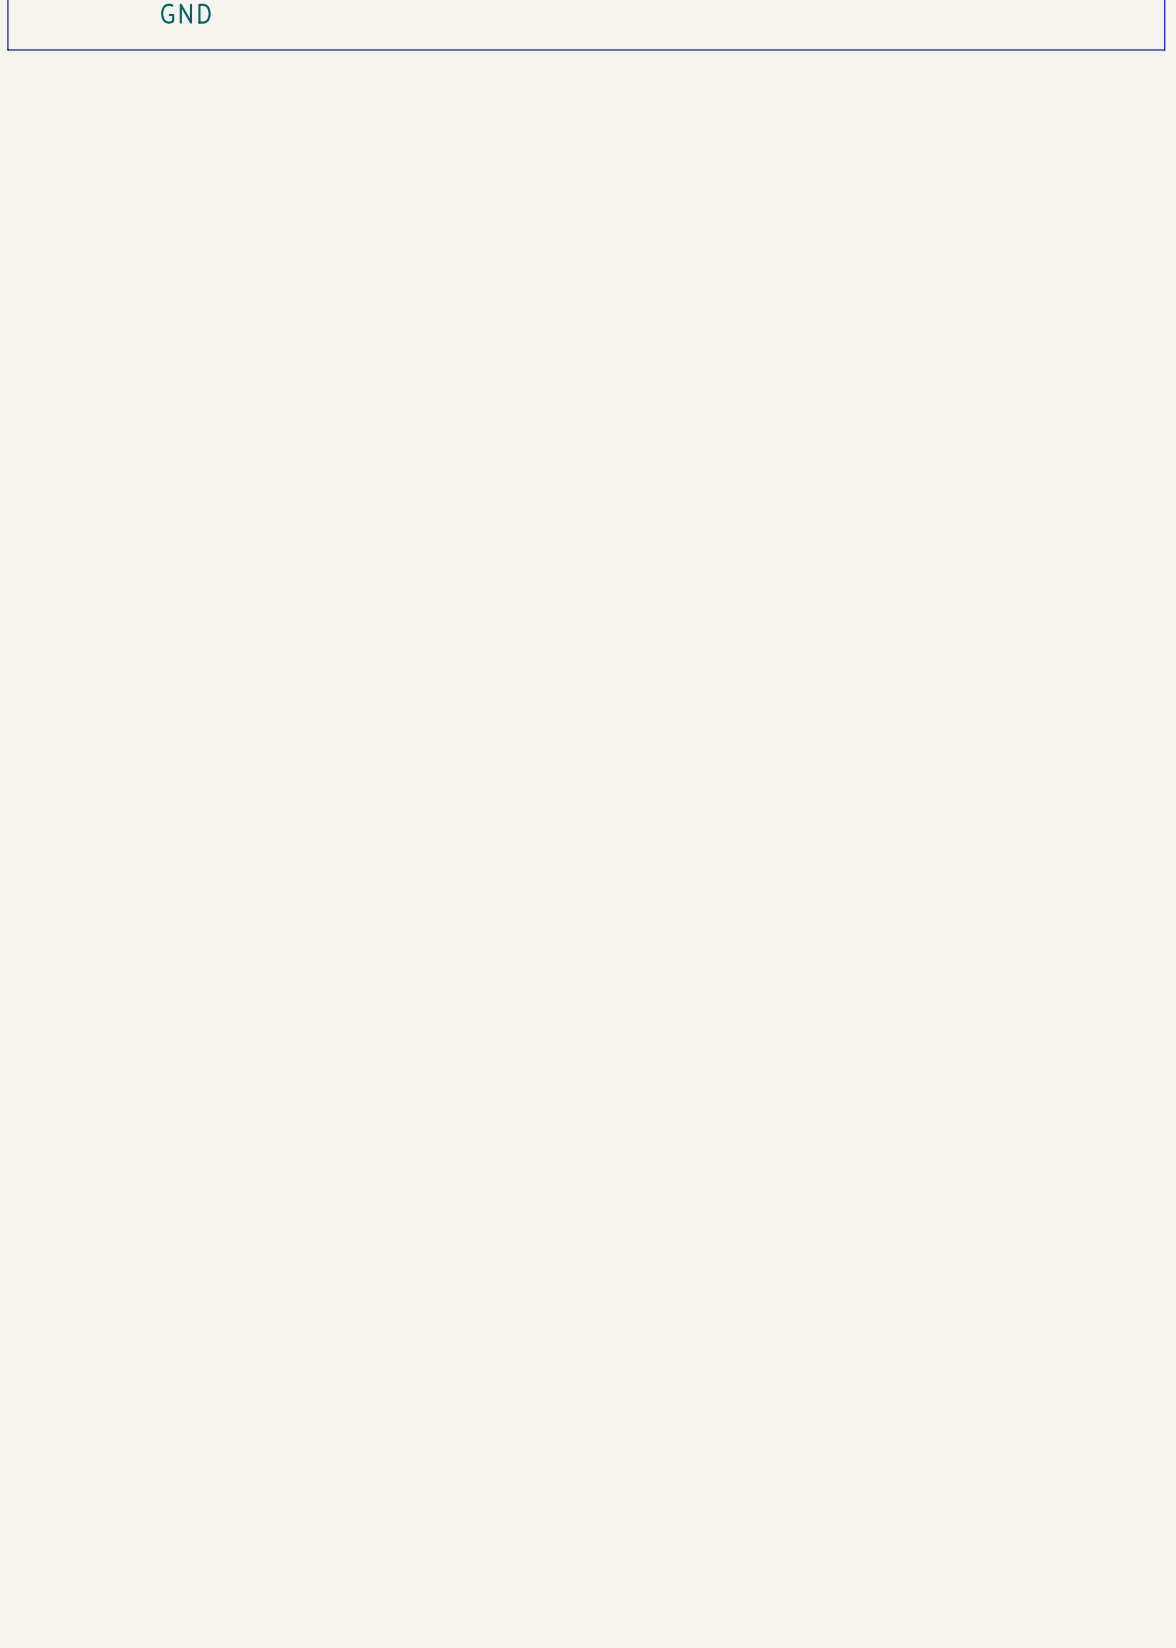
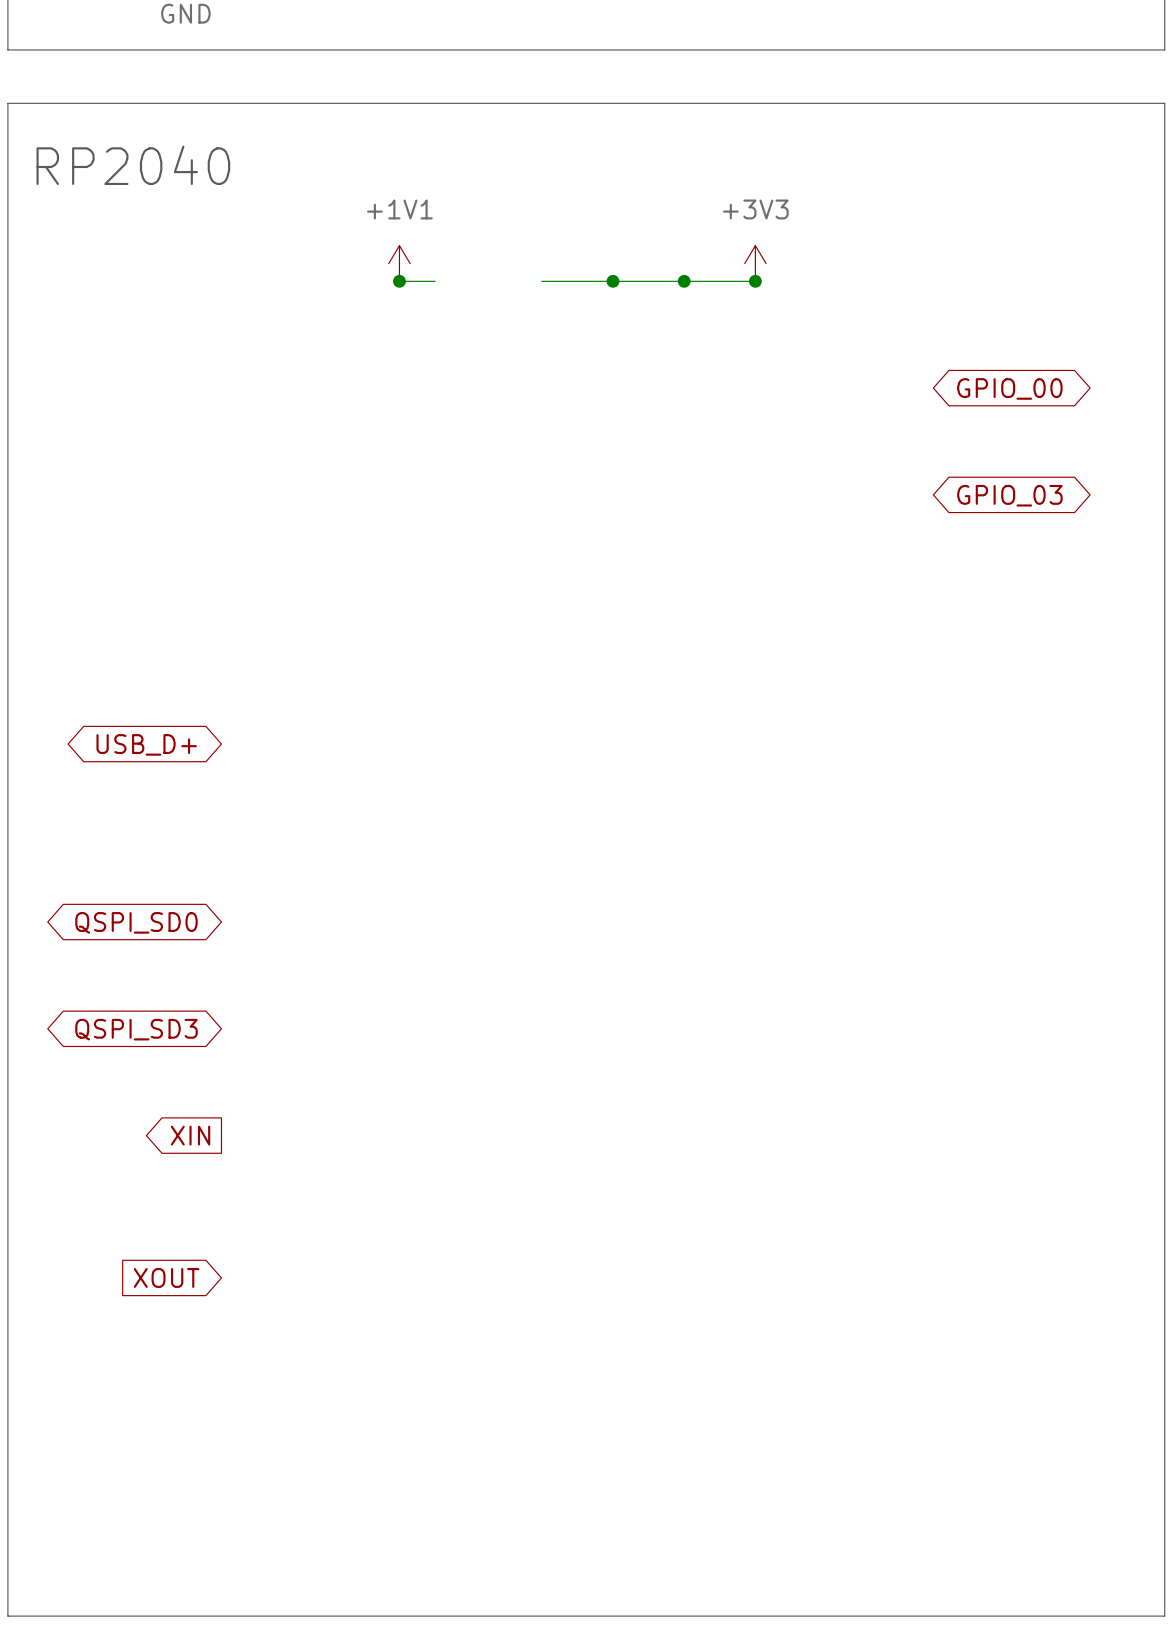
line: none -> (7, 103) (1164, 103) (1164, 1616) (7, 1616) (7, 103)
text: none -> RP2040 (133, 165)
power symbol: none -> +1V1 (399, 263)
power symbol: none -> +3V3 (755, 263)
wire: none -> (399, 281) (435, 281)
junction: none -> (399, 281)
wire: none -> (541, 281) (755, 281)
junction: none -> (613, 281)
junction: none -> (684, 281)
junction: none -> (755, 281)
global label: none -> GPIO_00 (1009, 388)
global label: none -> GPIO_03 (1009, 495)
global label: none -> USB_D+ (146, 744)
global label: none -> QSPI_SD0 (136, 922)
global label: none -> QSPI_SD3 (136, 1029)
global label: none -> XIN (190, 1135)
global label: none -> XOUT (166, 1277)

